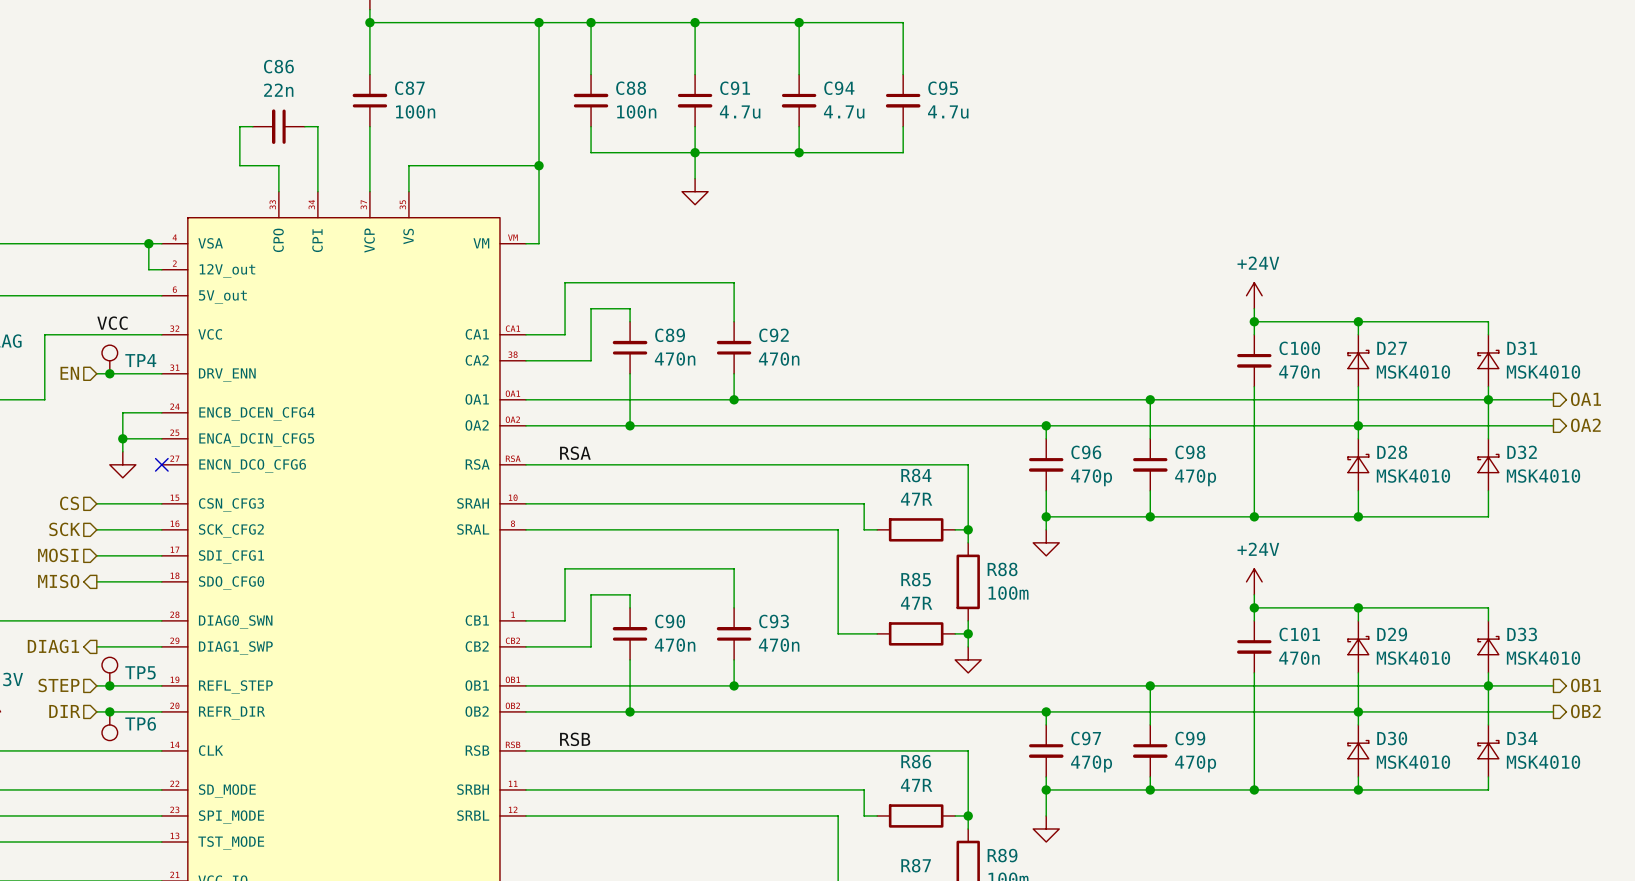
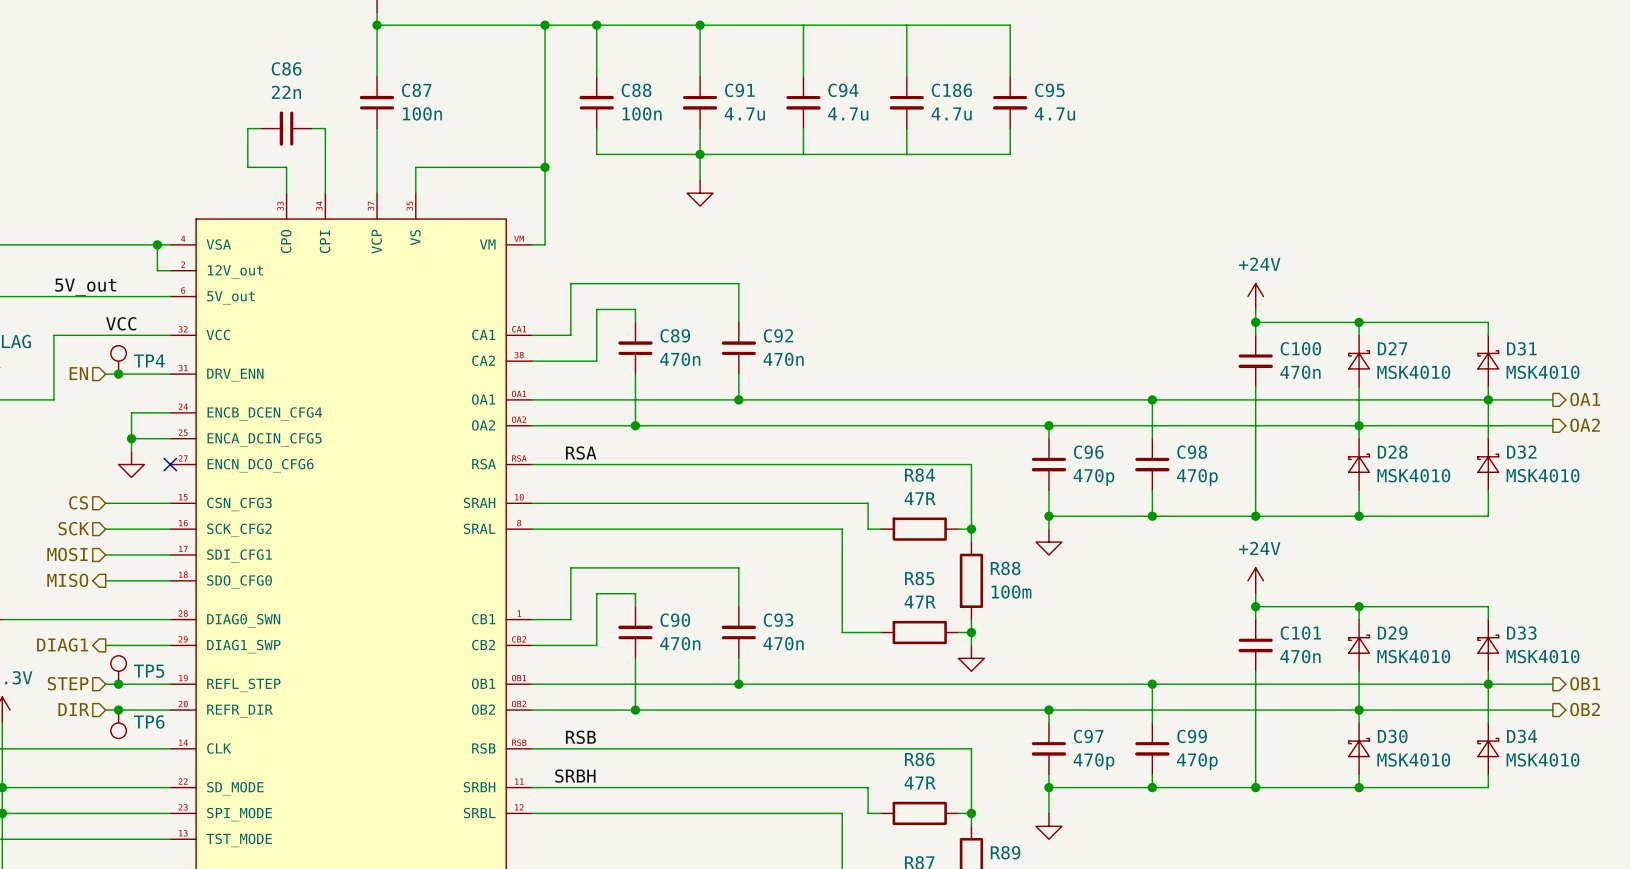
junction: (799, 22) -> none
wire: none -> (906, 25) (1010, 25) (1010, 76)
C95 name: C95 (943, 88) -> C186 (951, 90)
C95: none -> 4.7u (1010, 102)
wire: none -> (1010, 128) (1010, 154) (906, 154)
junction: (799, 152) -> none
label: none -> 5V_out (85, 287)
label: none -> SRBH (575, 776)

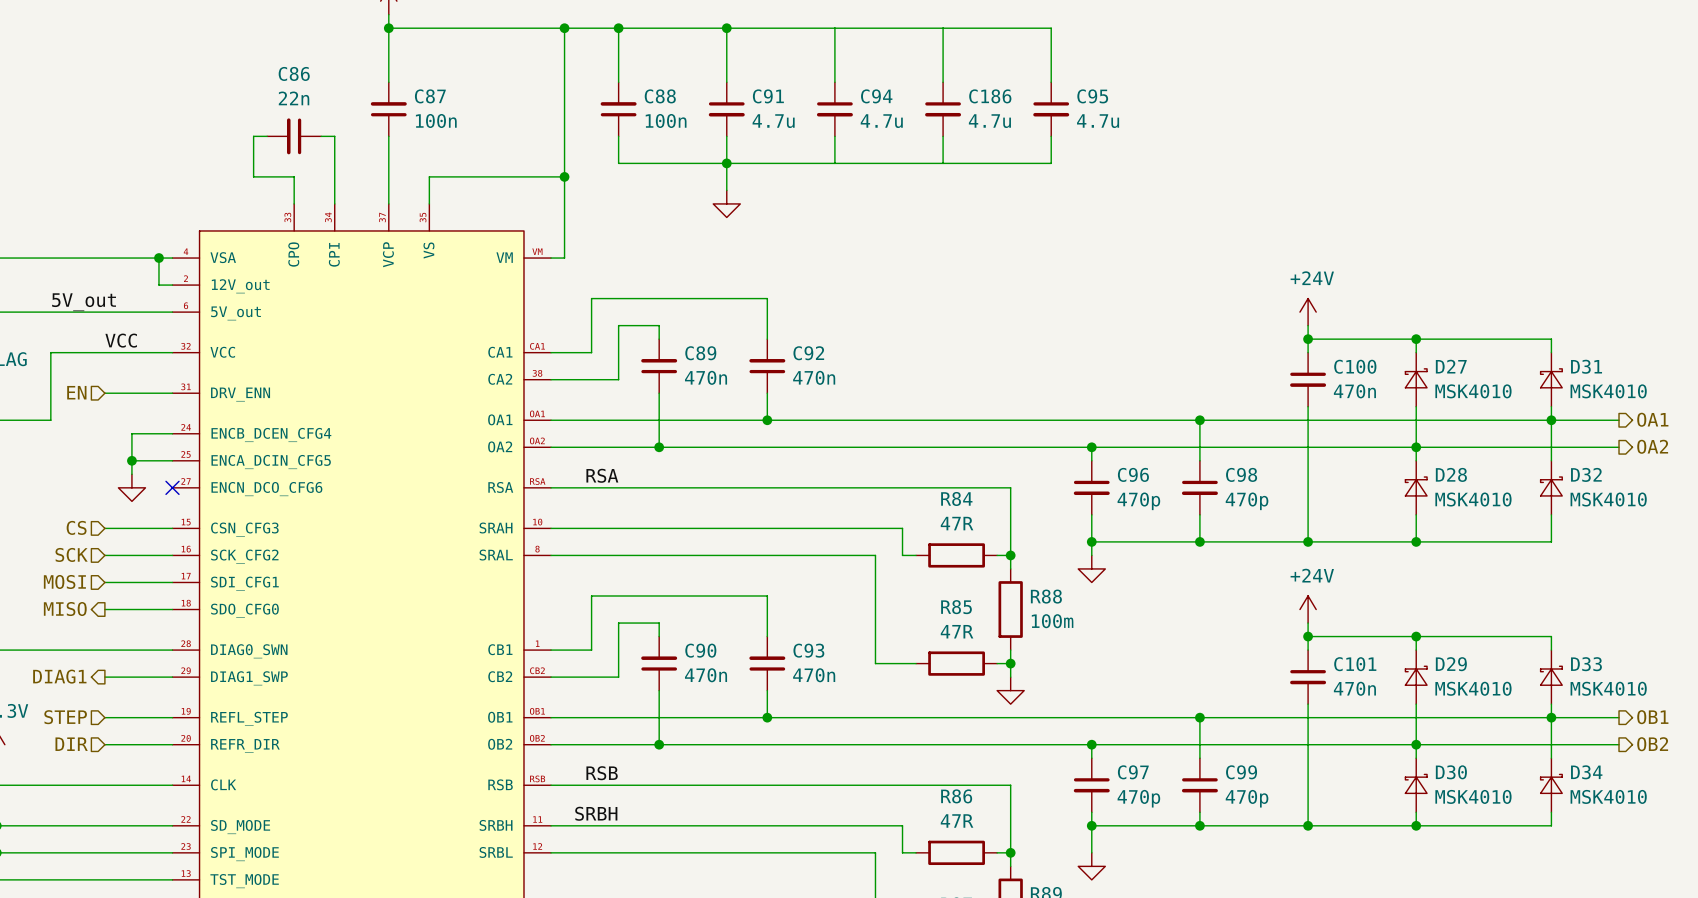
TP4: (118, 359) -> none
junction: (118, 374) -> none
TP5: (118, 669) -> none
junction: (118, 684) -> none
junction: (118, 710) -> none
TP6: (118, 724) -> none

